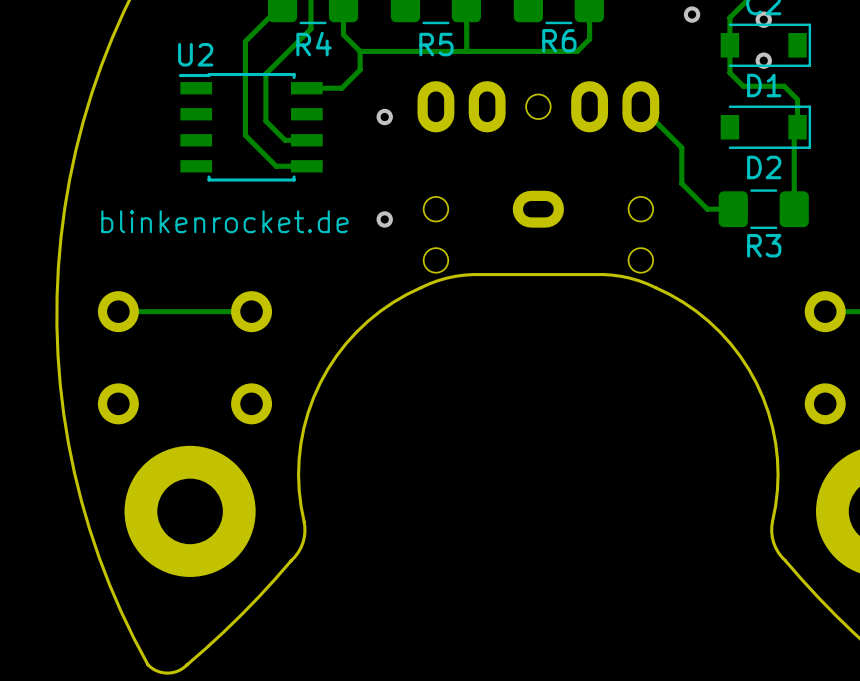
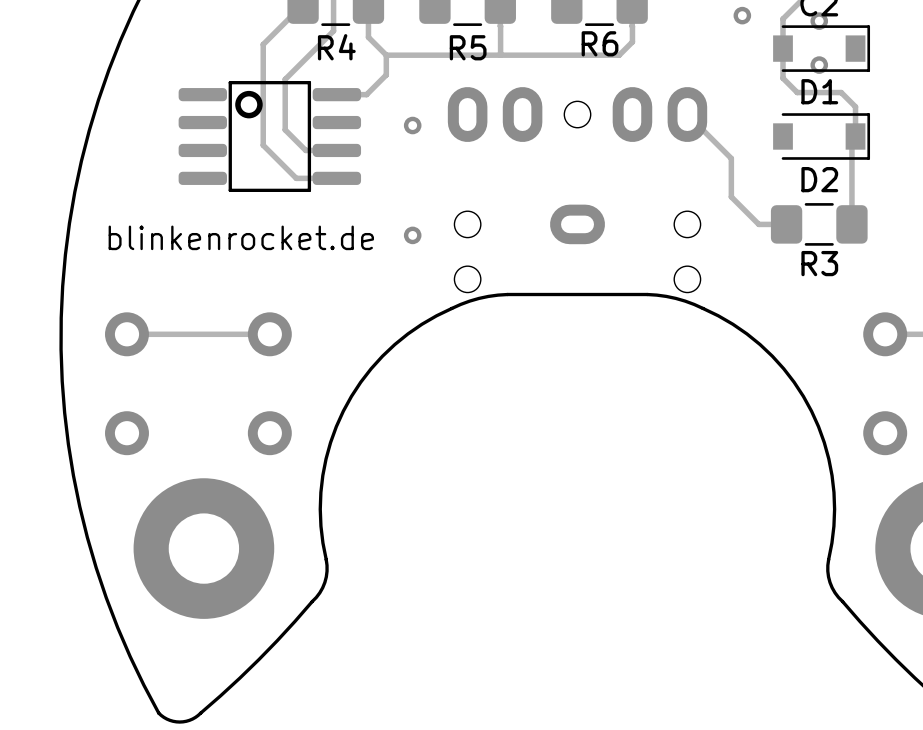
U2: (250, 127) -> none
part: none -> (269, 136)

